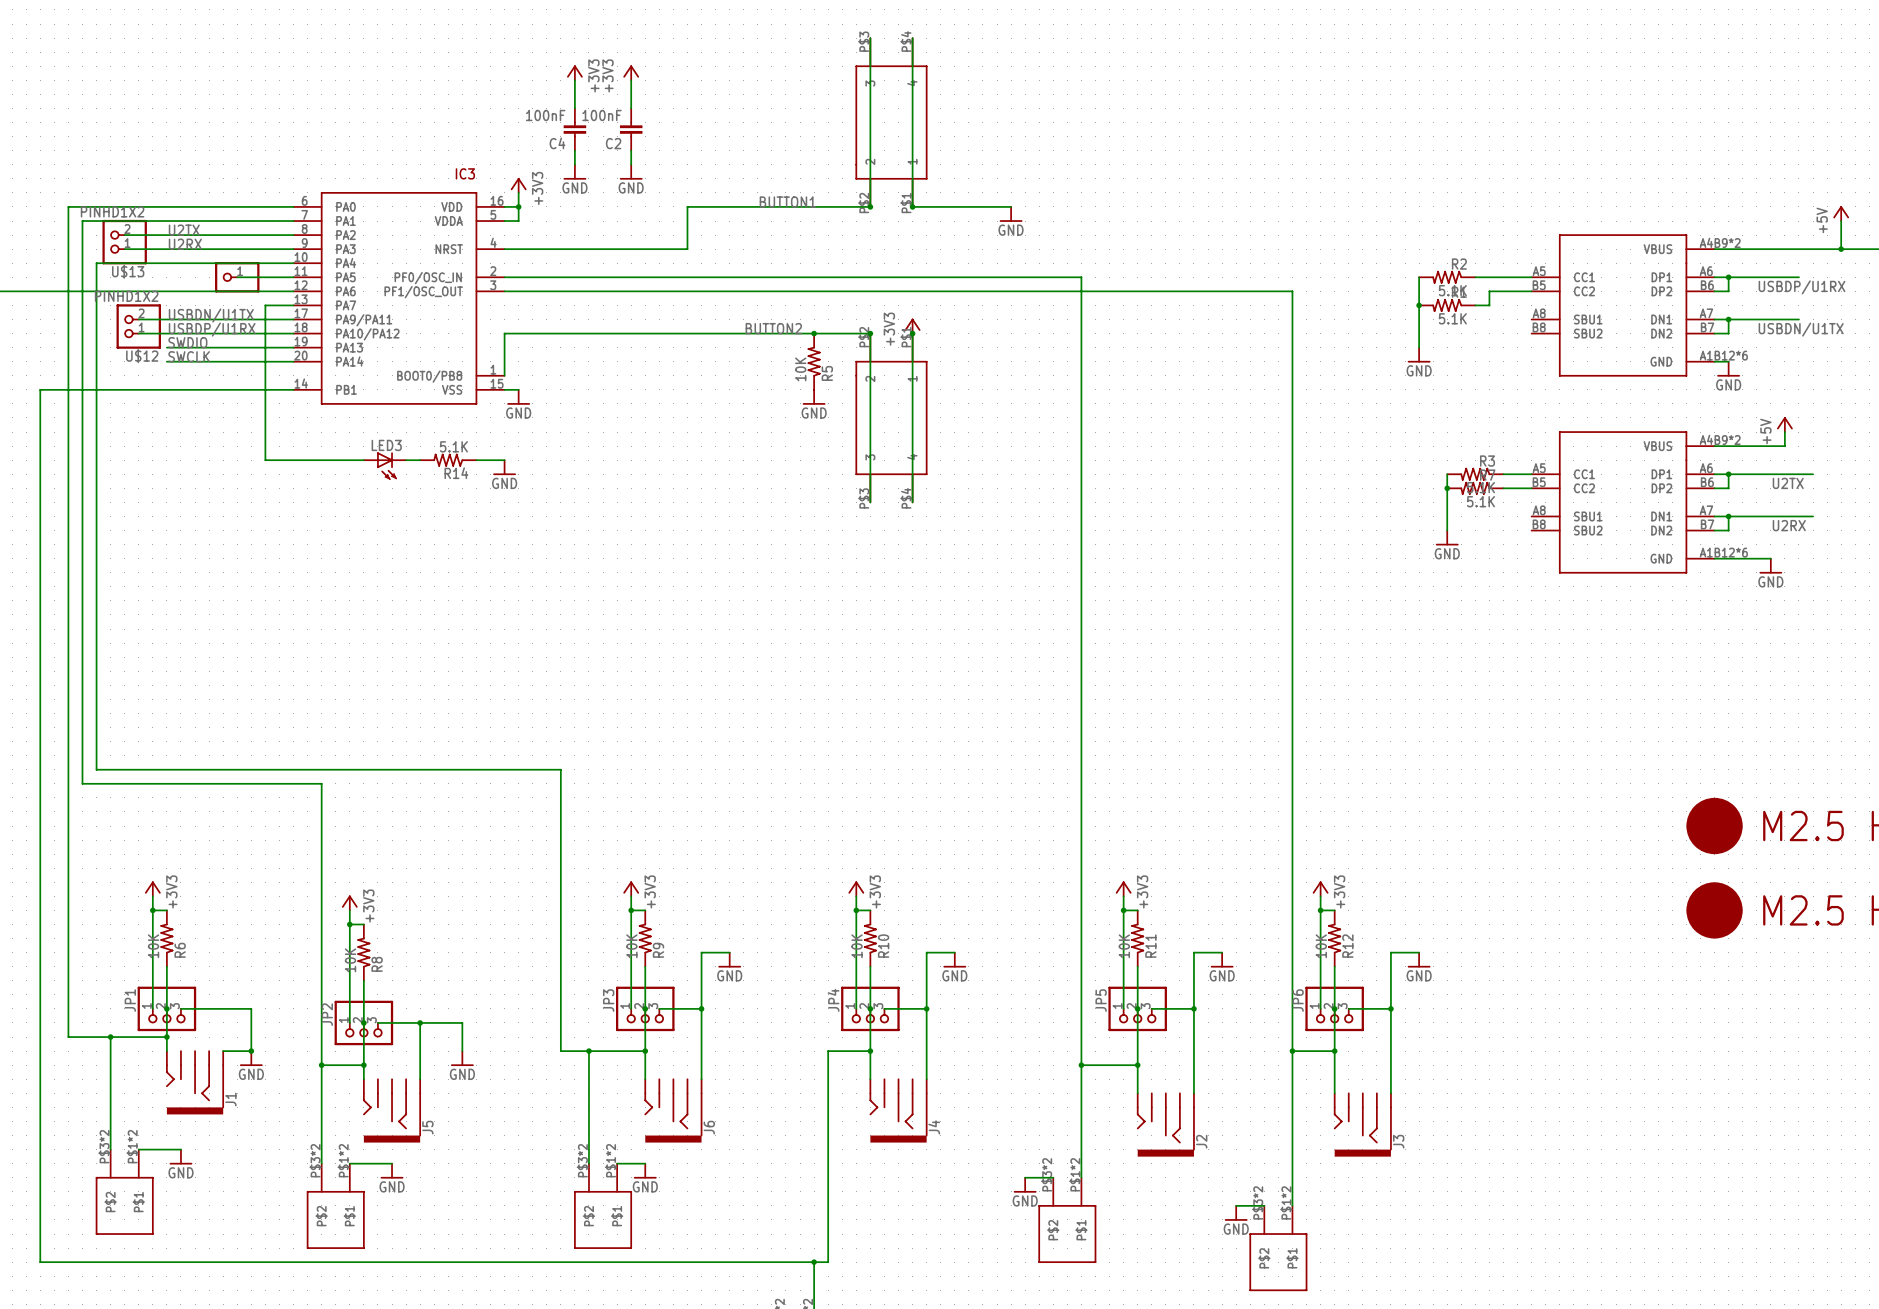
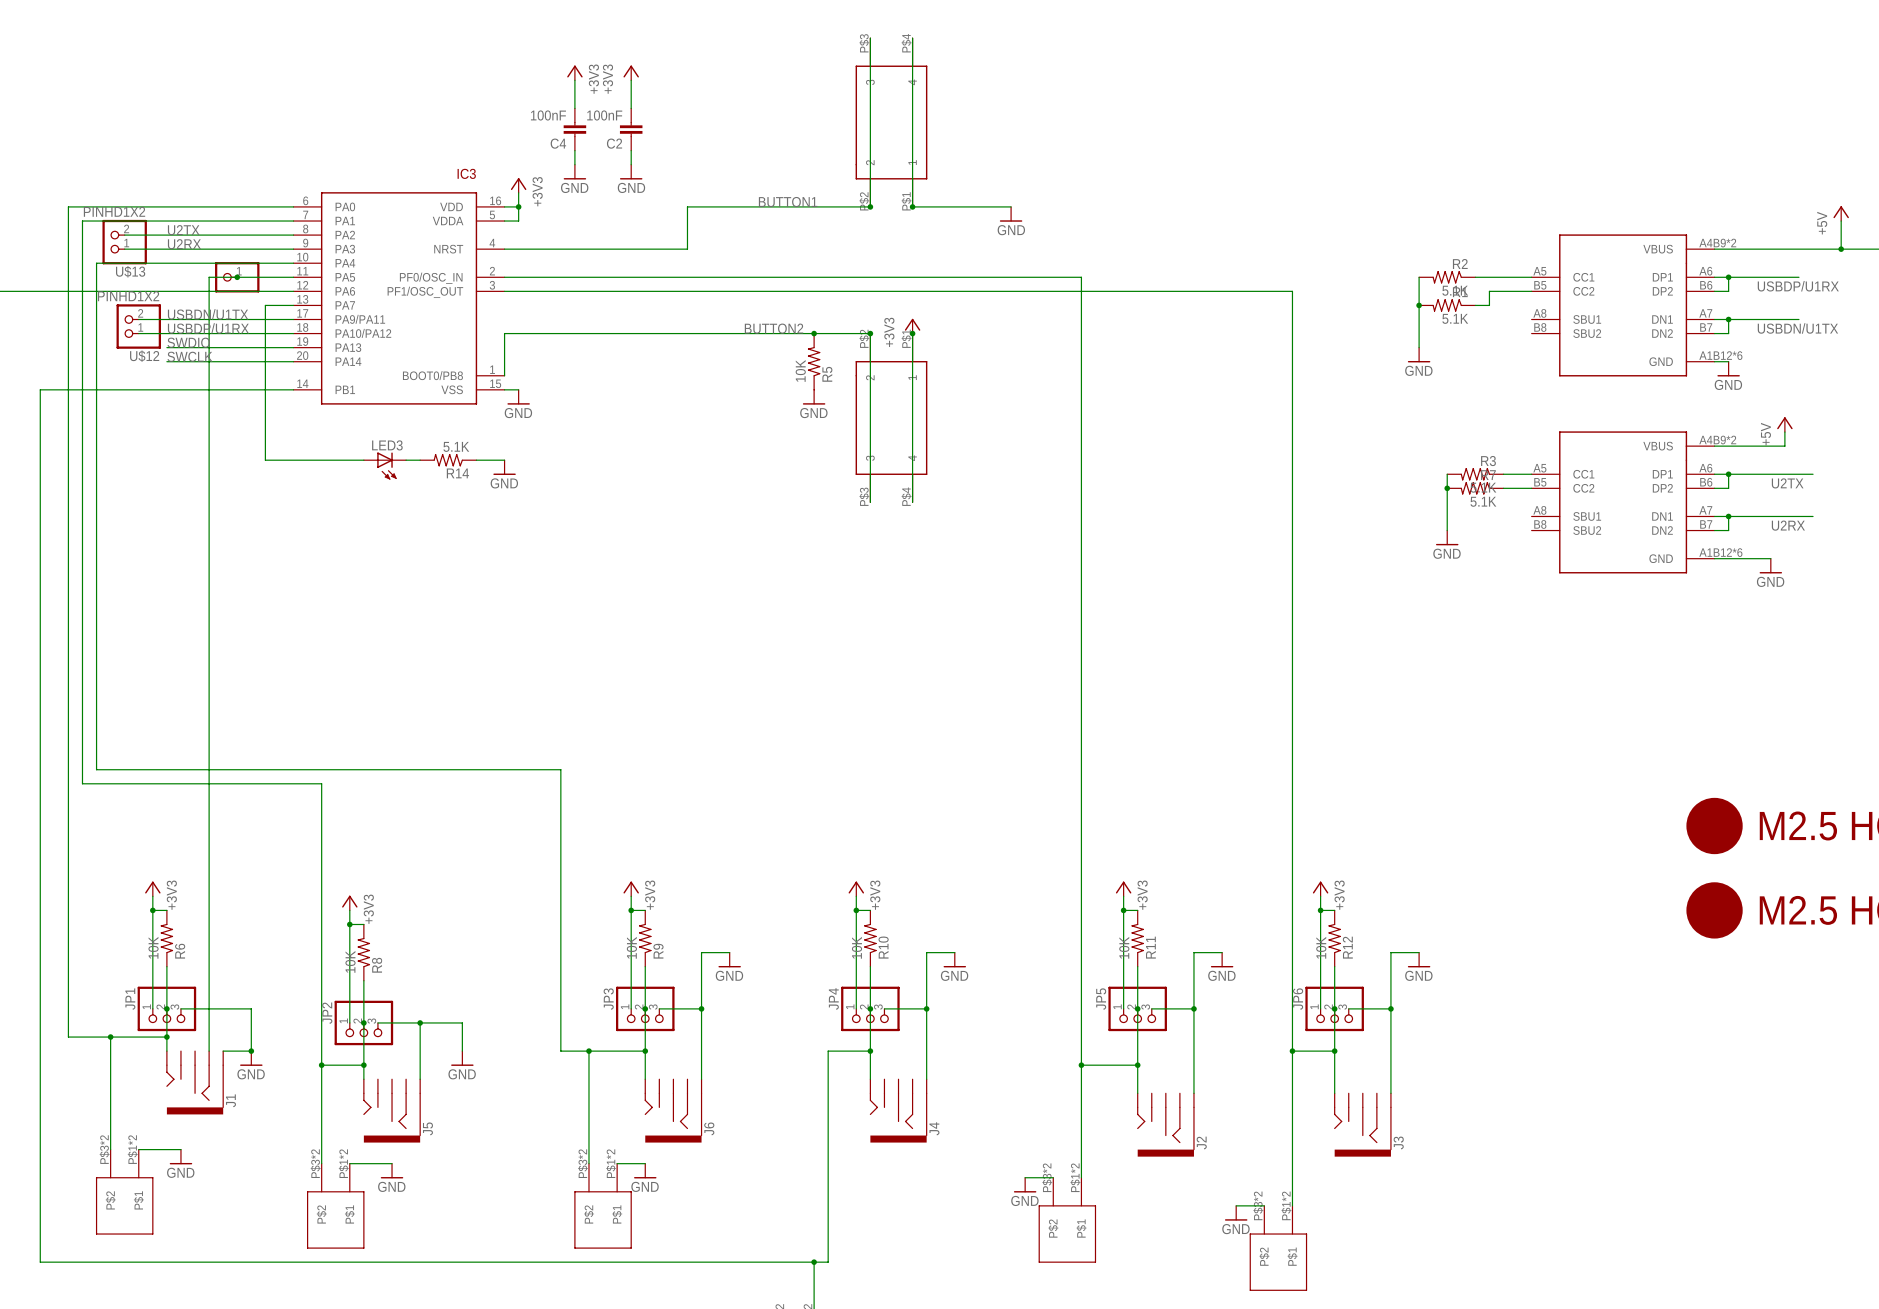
wire: none -> (237, 277) (209, 277) (209, 1051)
junction: none -> (237, 277)

